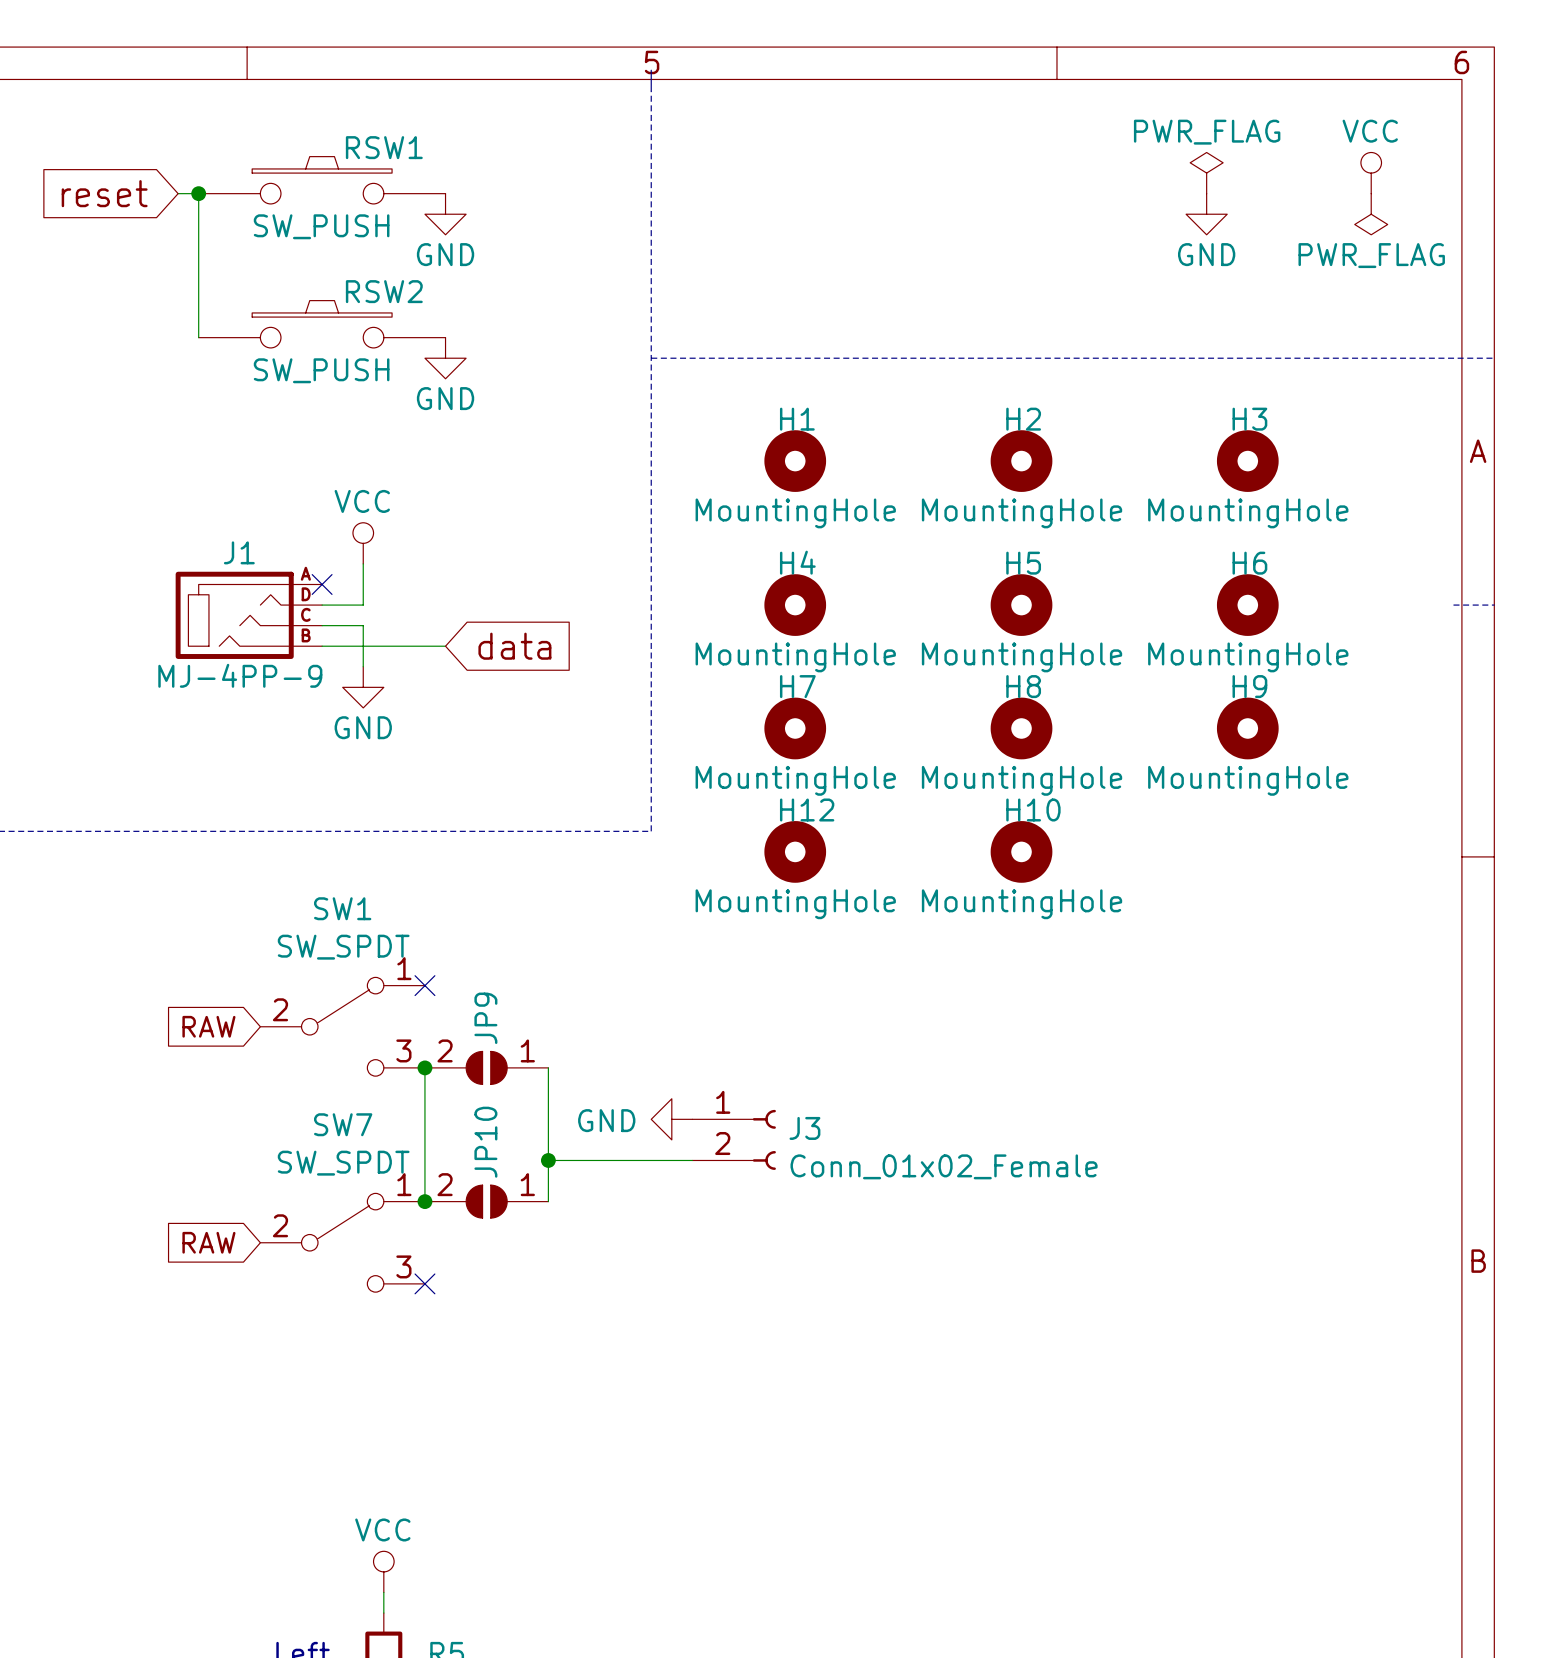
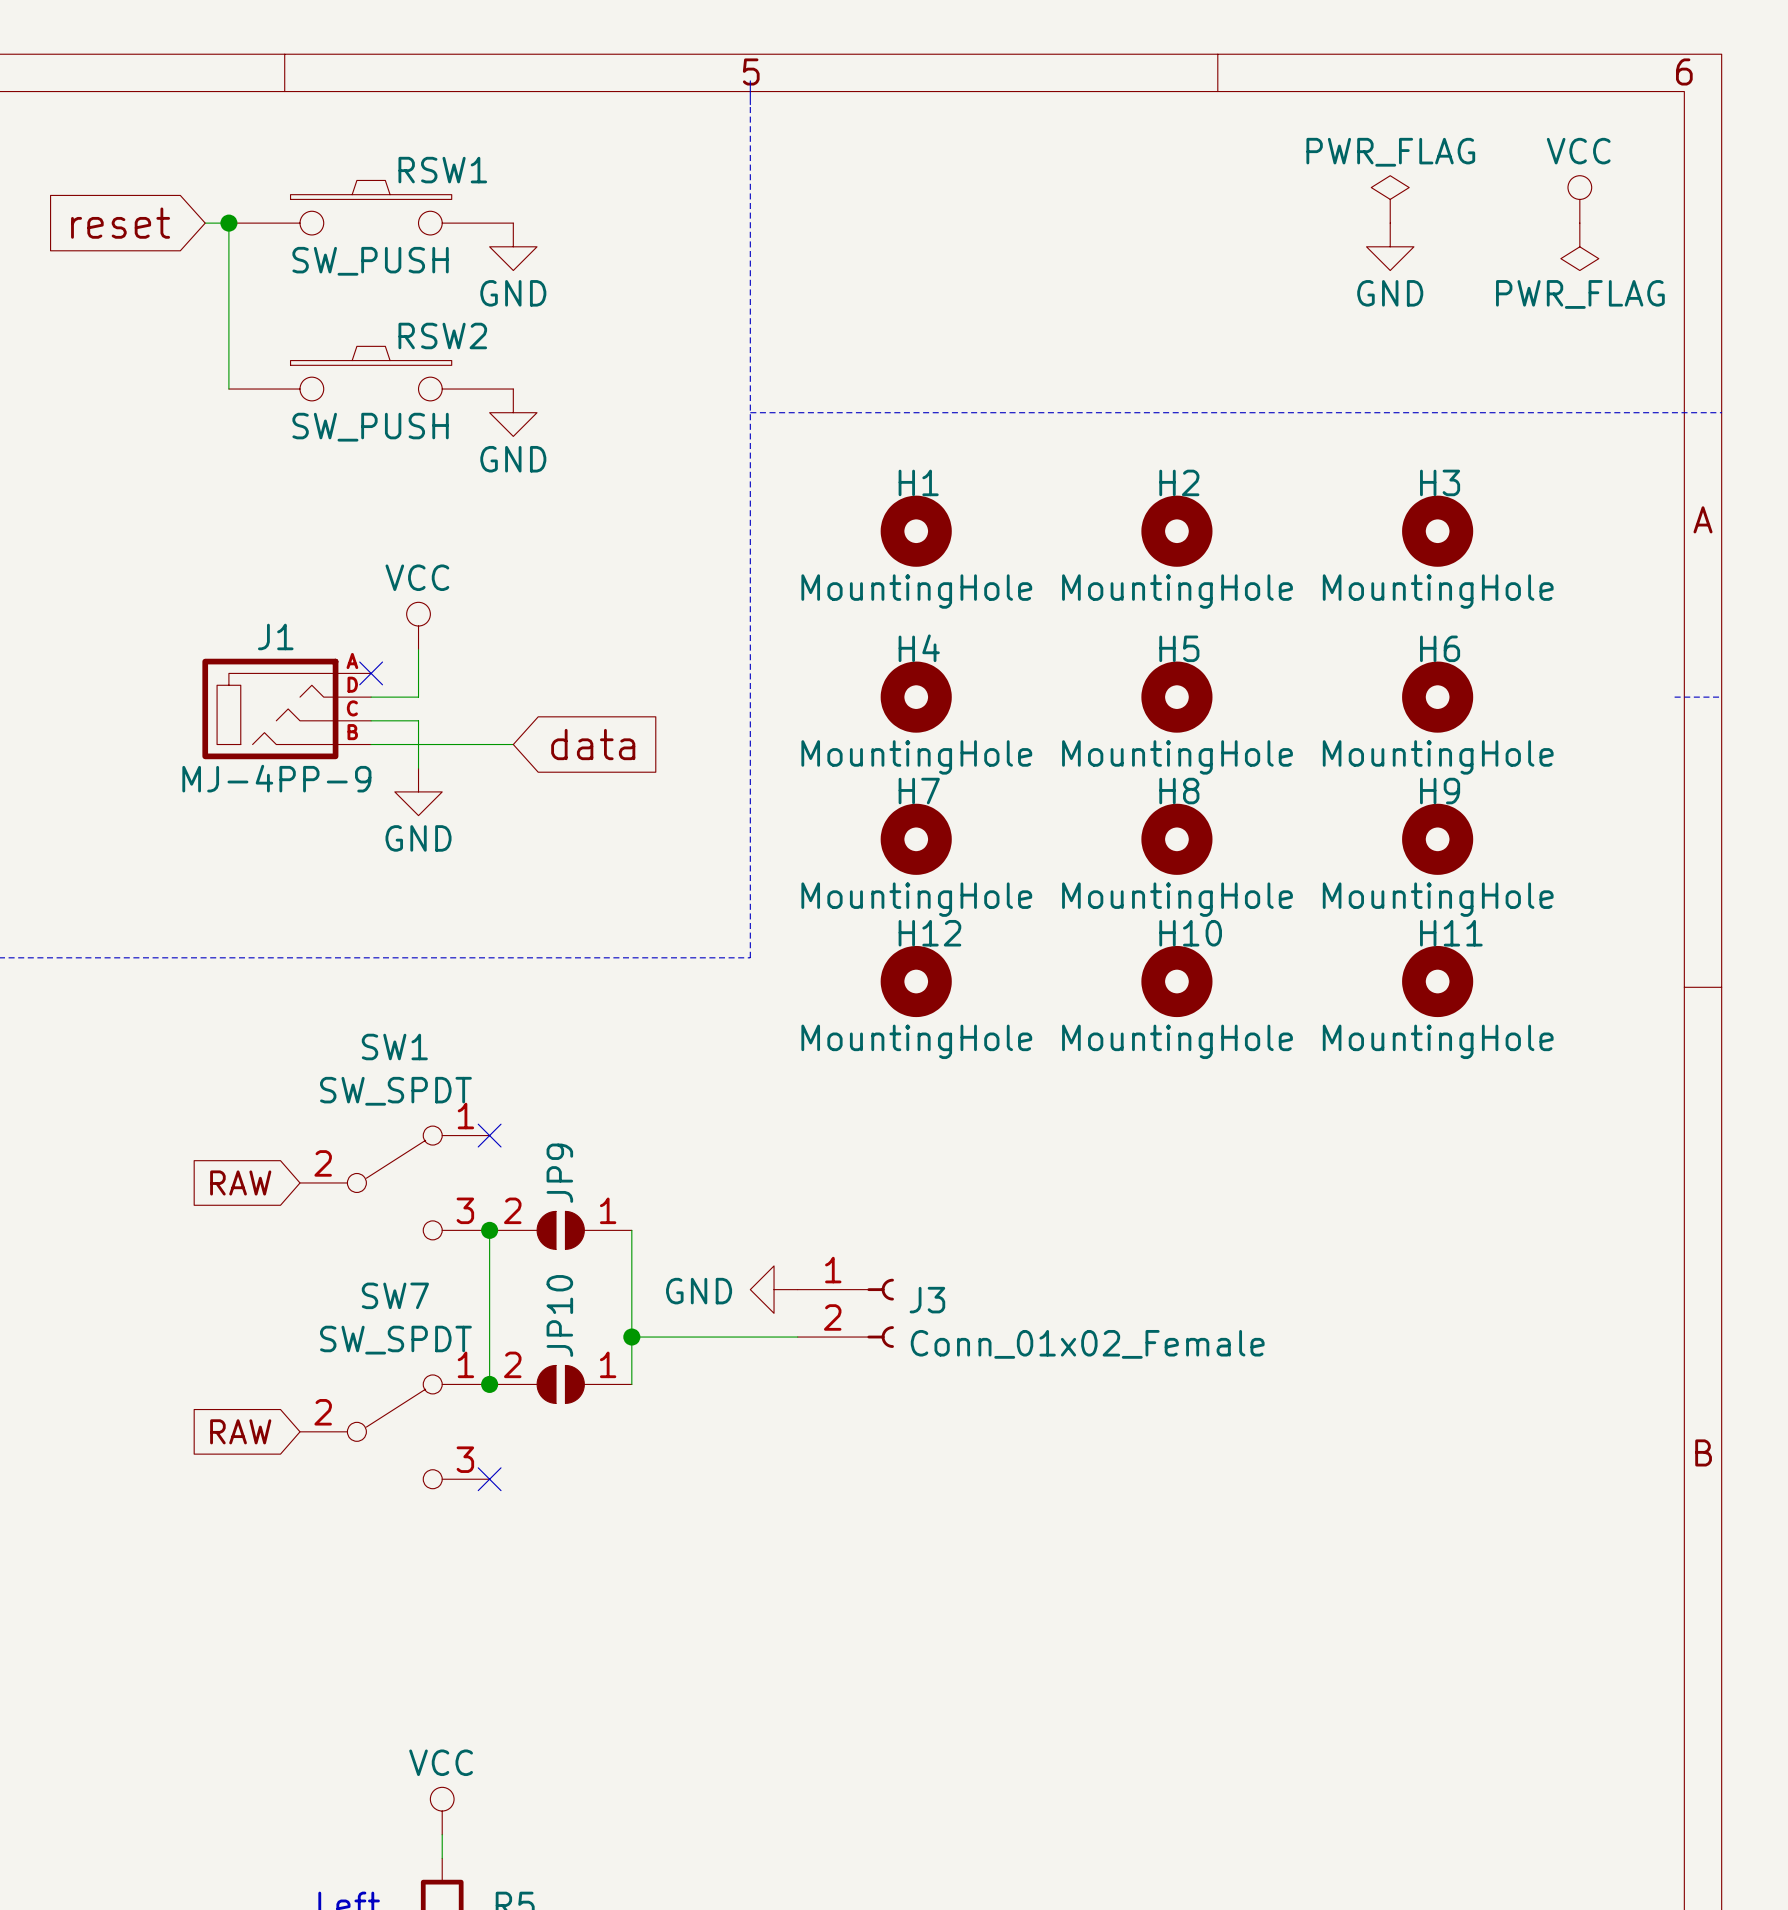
H11: none -> MountingHole (1437, 981)

